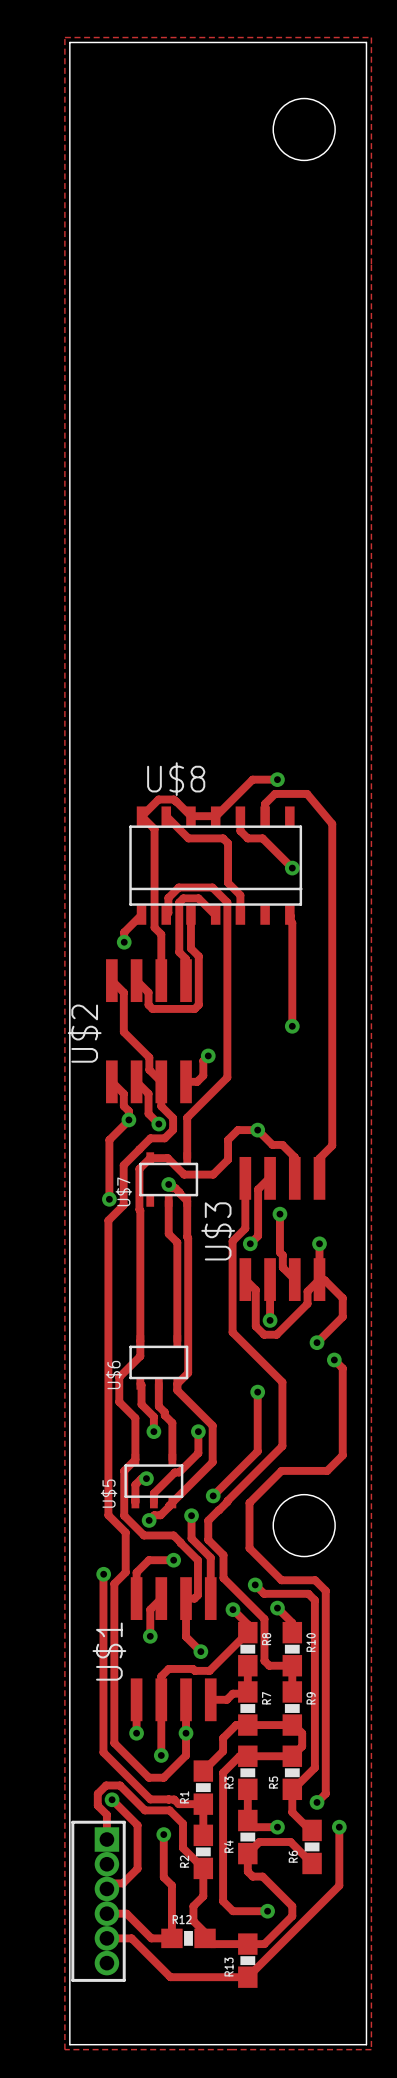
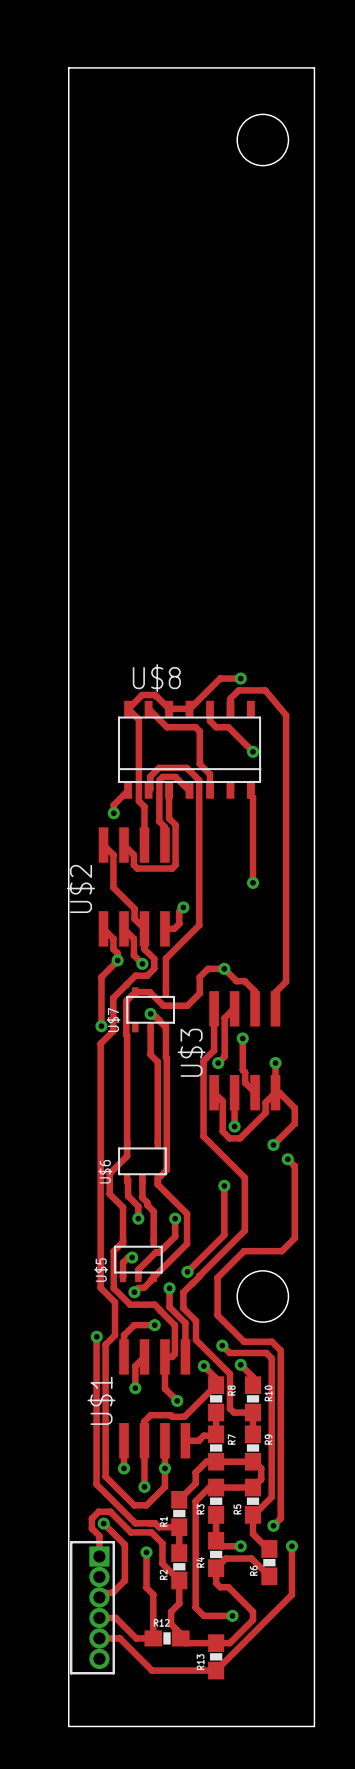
zone outline: (64, 37) (371, 37) (371, 2049) (64, 2049) (64, 37) -> none

